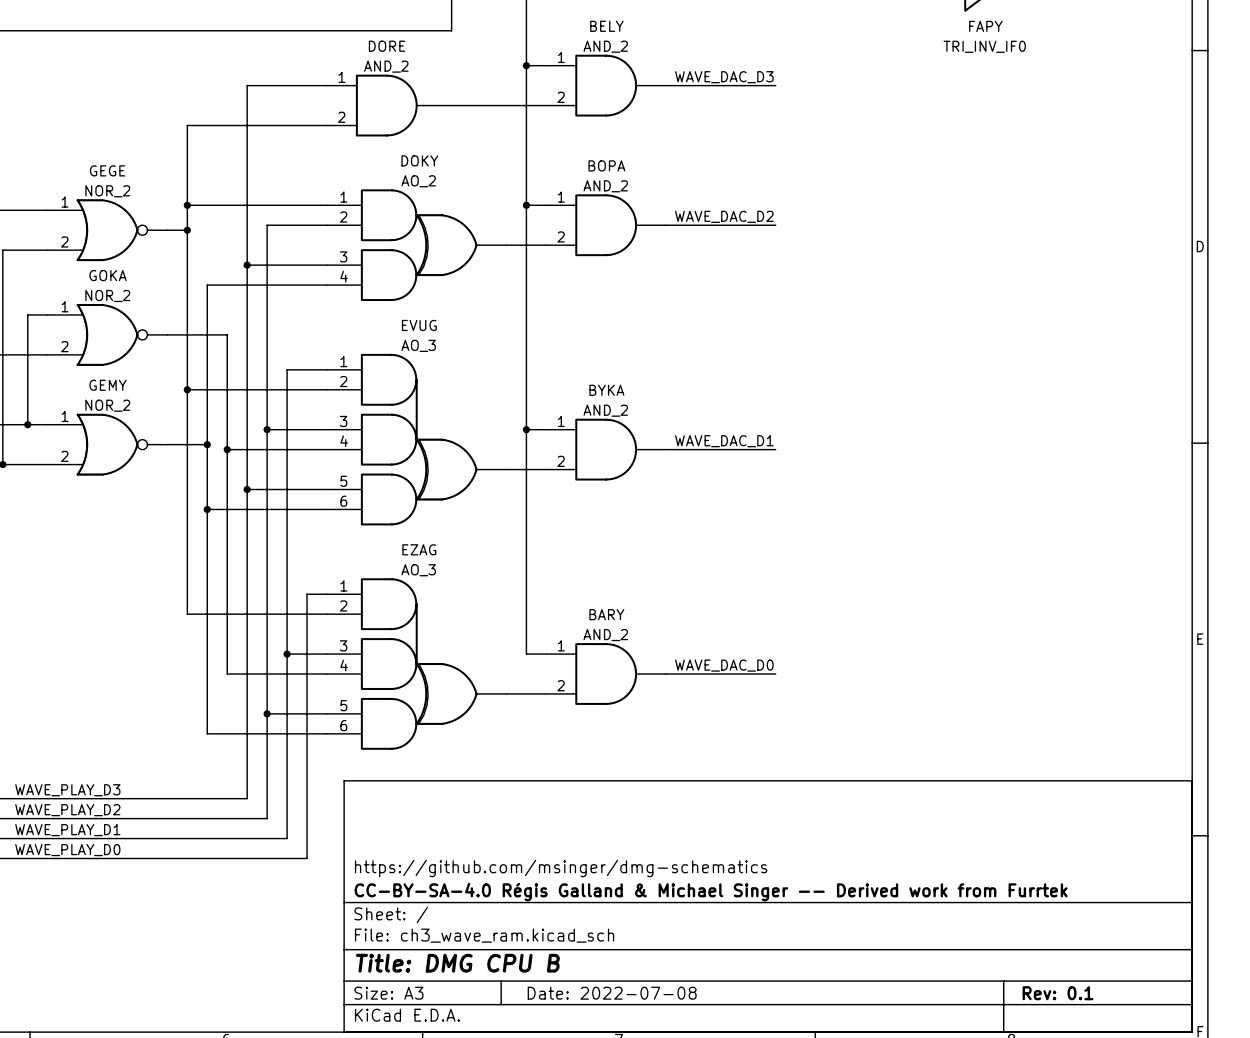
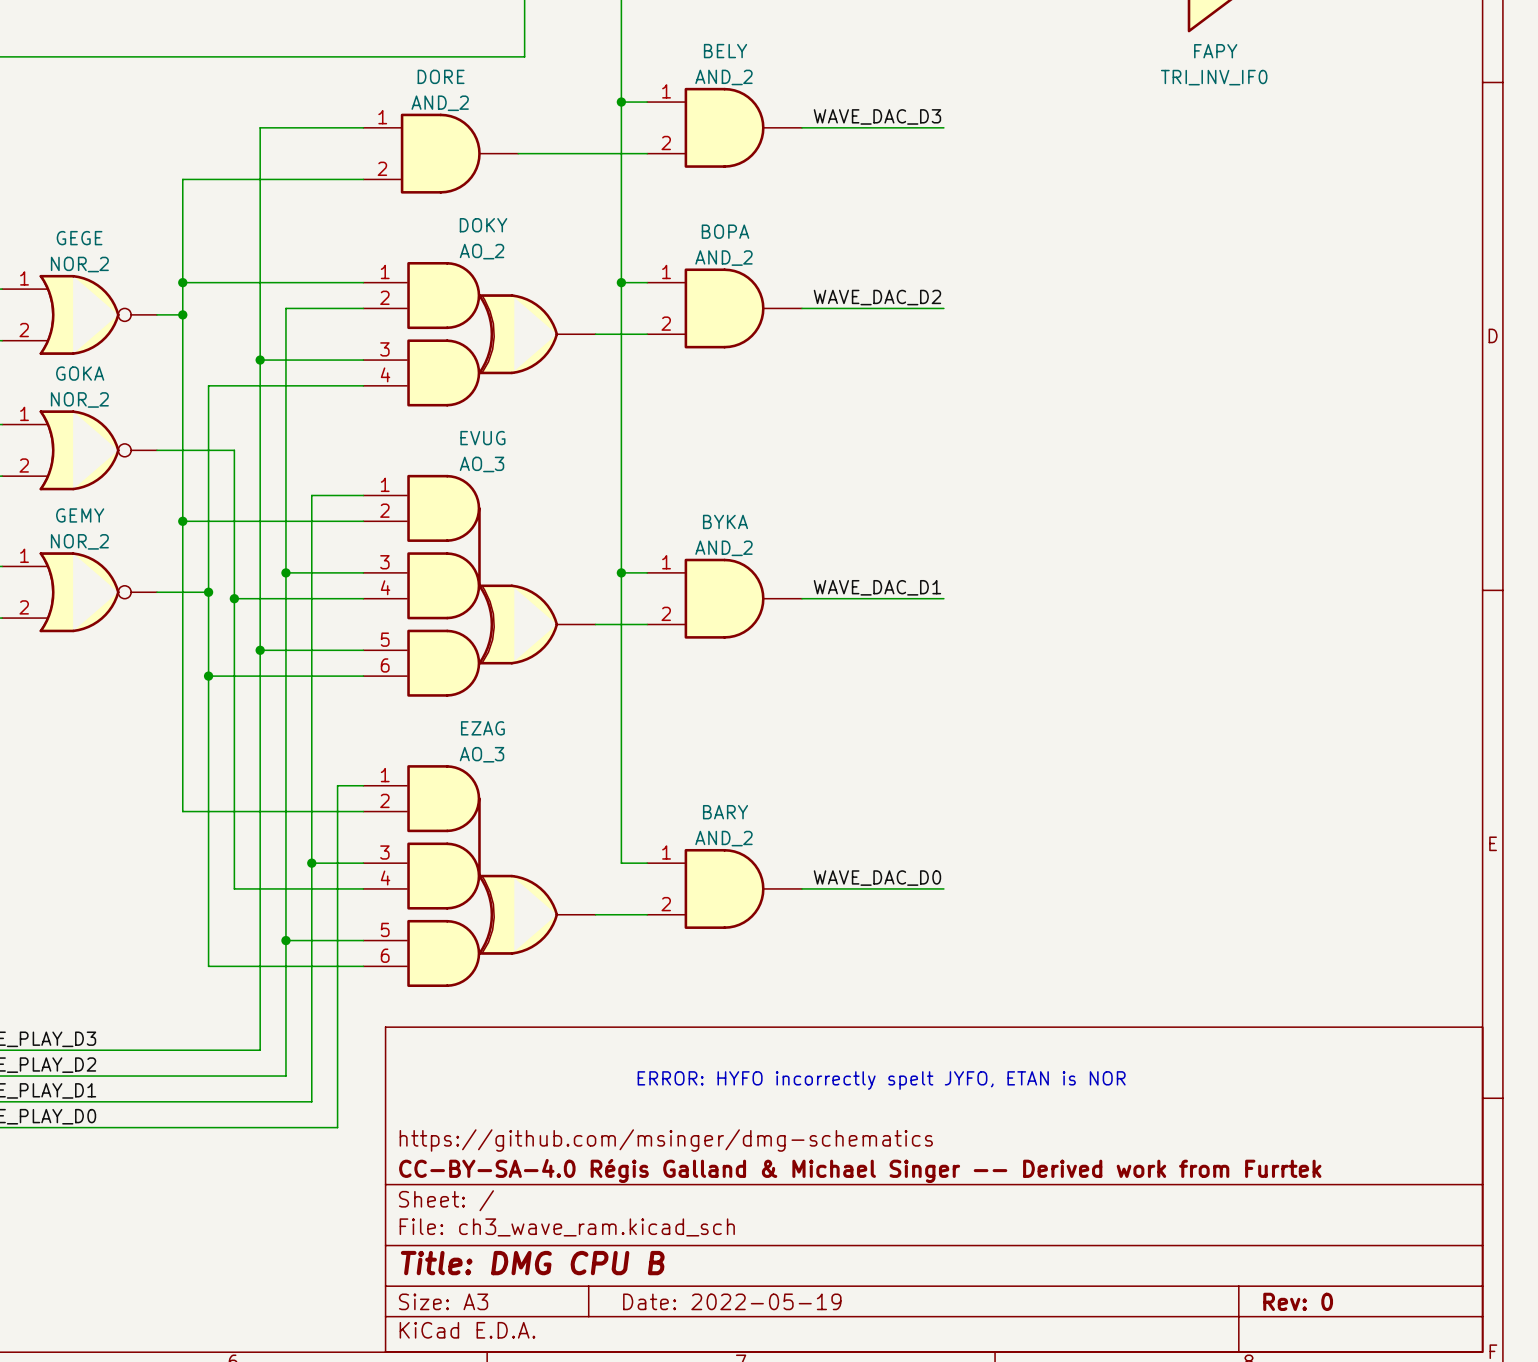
text: none -> ERROR: HYFO incorrectly spelt JYFO, ETAN is NOR (881, 1080)
title block: Date: 2022-07-08 (612, 993) -> Date: 2022-05-19 (732, 1301)
title block: Rev: 0.1 (1058, 993) -> Rev: 0 (1298, 1301)

